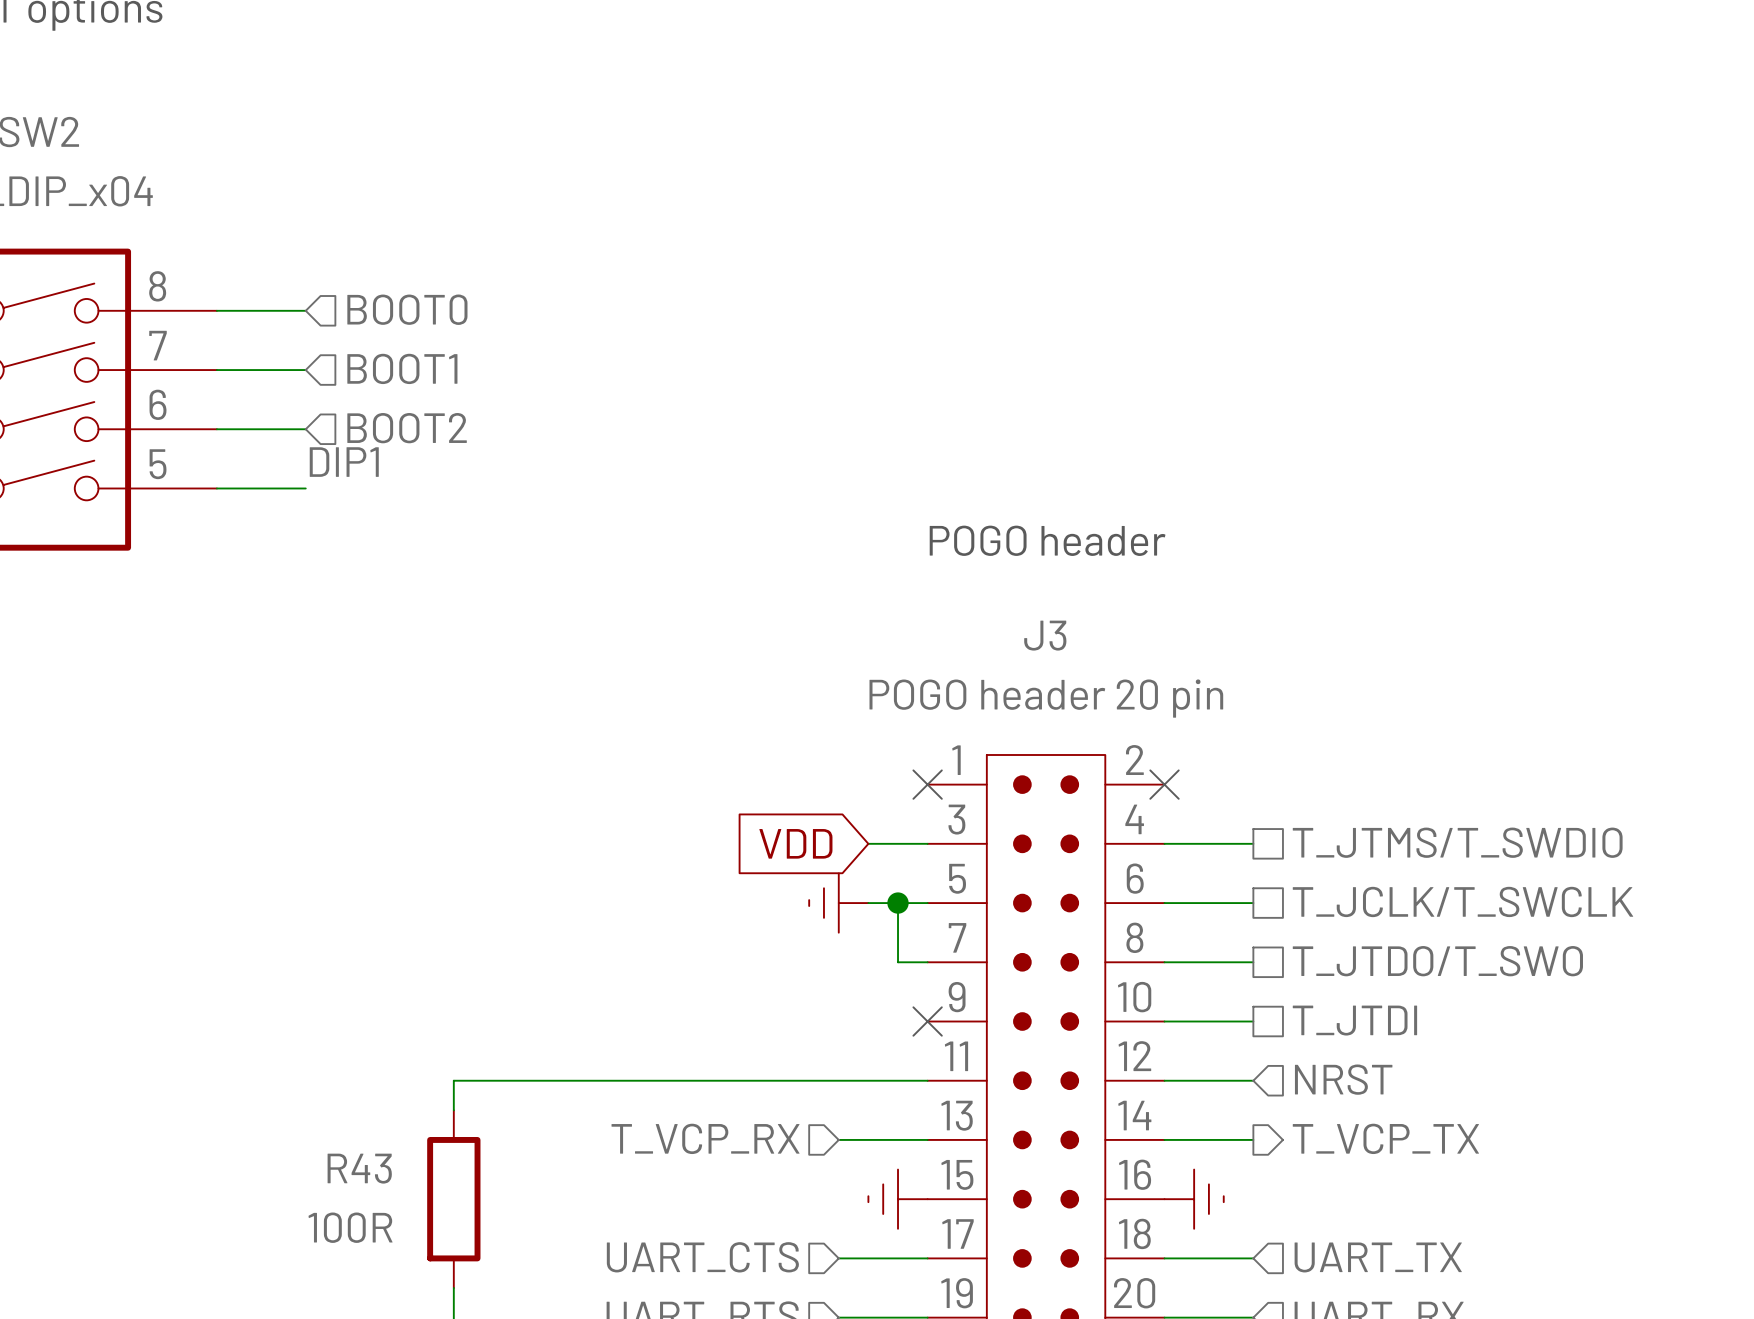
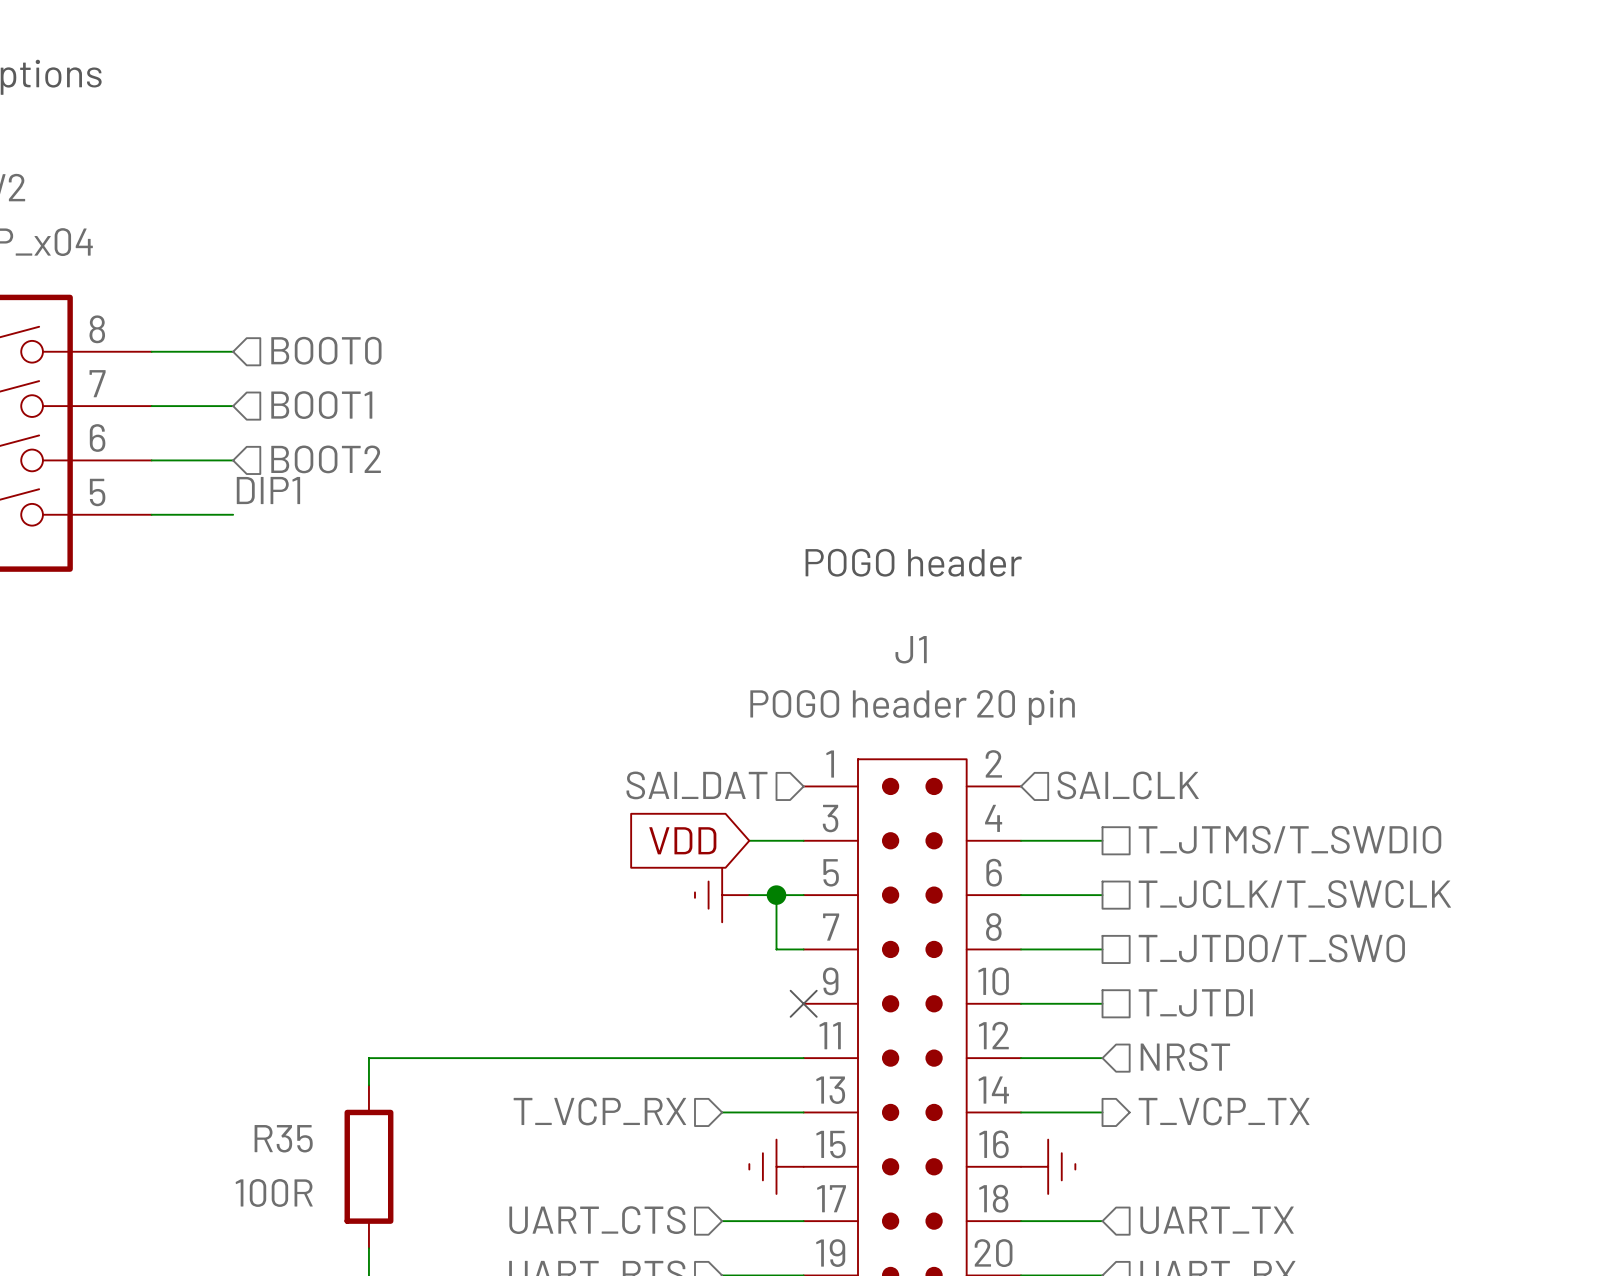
J3 name: J3 (1045, 635) -> J1 (911, 649)
hierarchical label: none -> SAI_DAT (696, 785)
hierarchical label: none -> SAI_CLK (1128, 785)
no-connect mark: (927, 784) -> none
no-connect mark: (1164, 784) -> none
R43 name: R43 (359, 1168) -> R35 (283, 1138)

